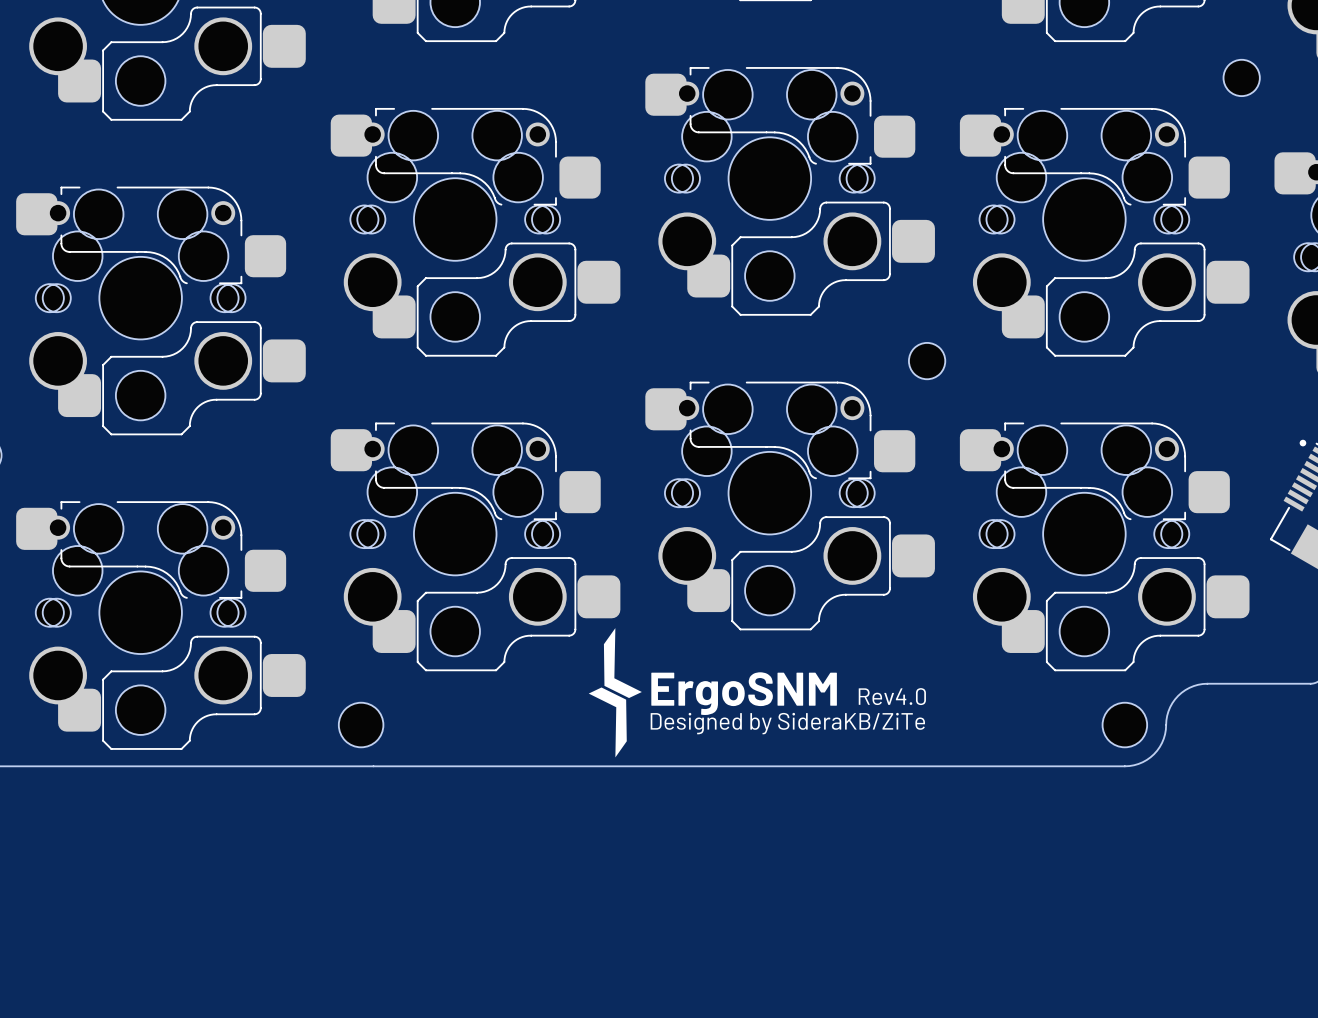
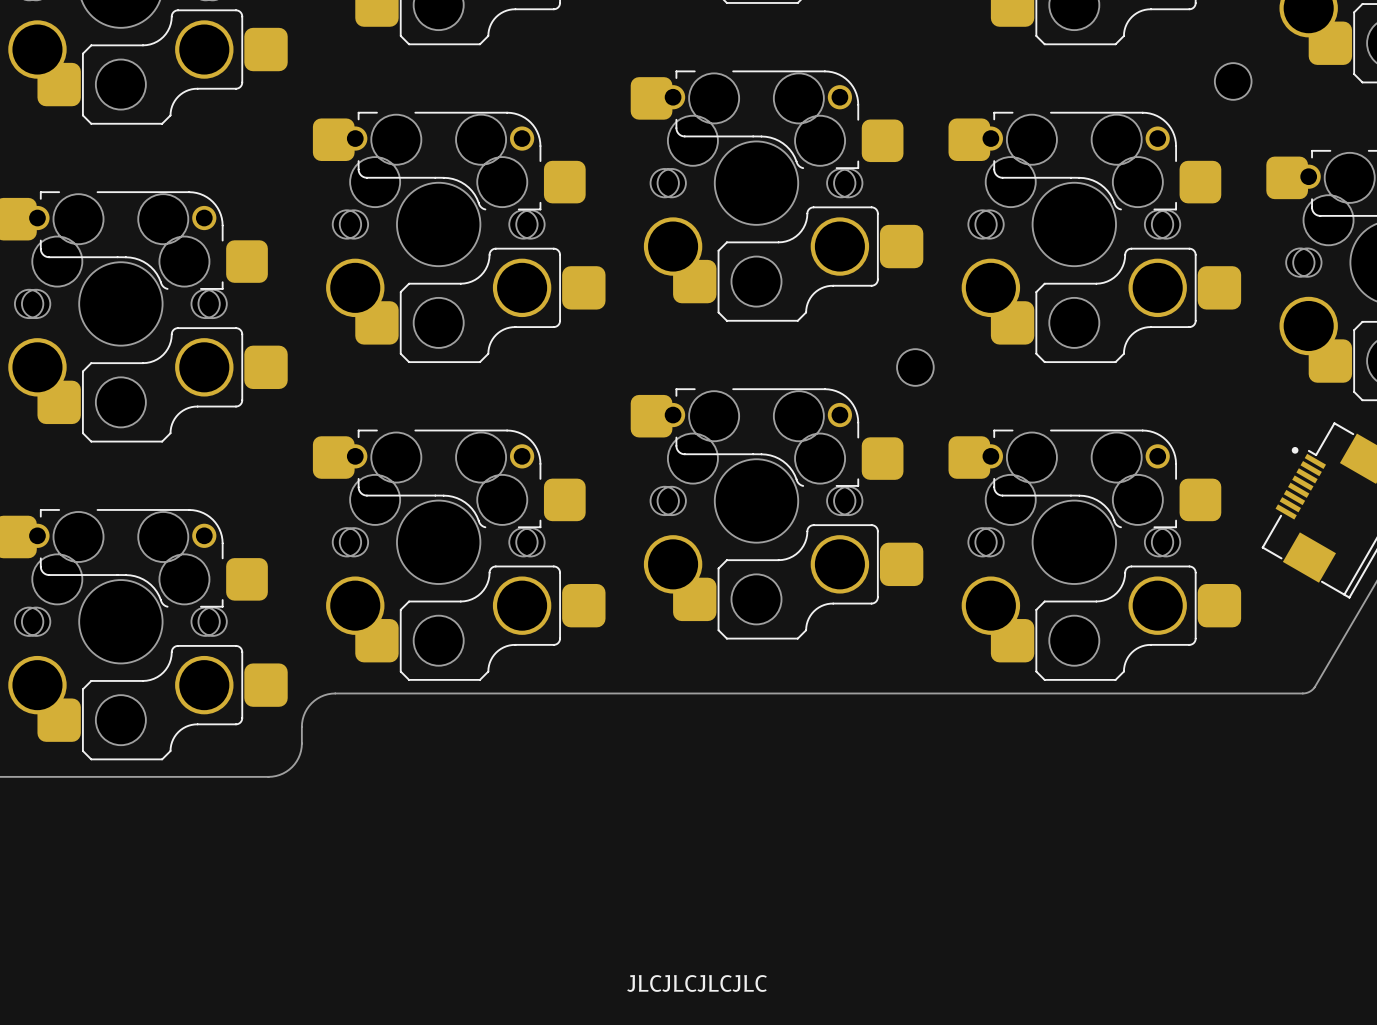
drawing: [588, 628, 642, 758] -> none
board edge: (1207, 683) (1189, 687) (1178, 695) (1168, 711) (1165, 734) (1159, 746) (1146, 759) (1129, 766) (286, 766) -> (1198, 693) (331, 693) (314, 700) (305, 712) (302, 723) (301, 750) (294, 764) (283, 773) (268, 776)
text: ErgoSNM (744, 693) -> none
text: Rev4.0 (892, 696) -> none
text: Designed by SideraKB/ZiTe (787, 723) -> none
part: (361, 725) -> none
part: (1124, 725) -> none
text: none -> JLCJLCJLCJLC (697, 983)

